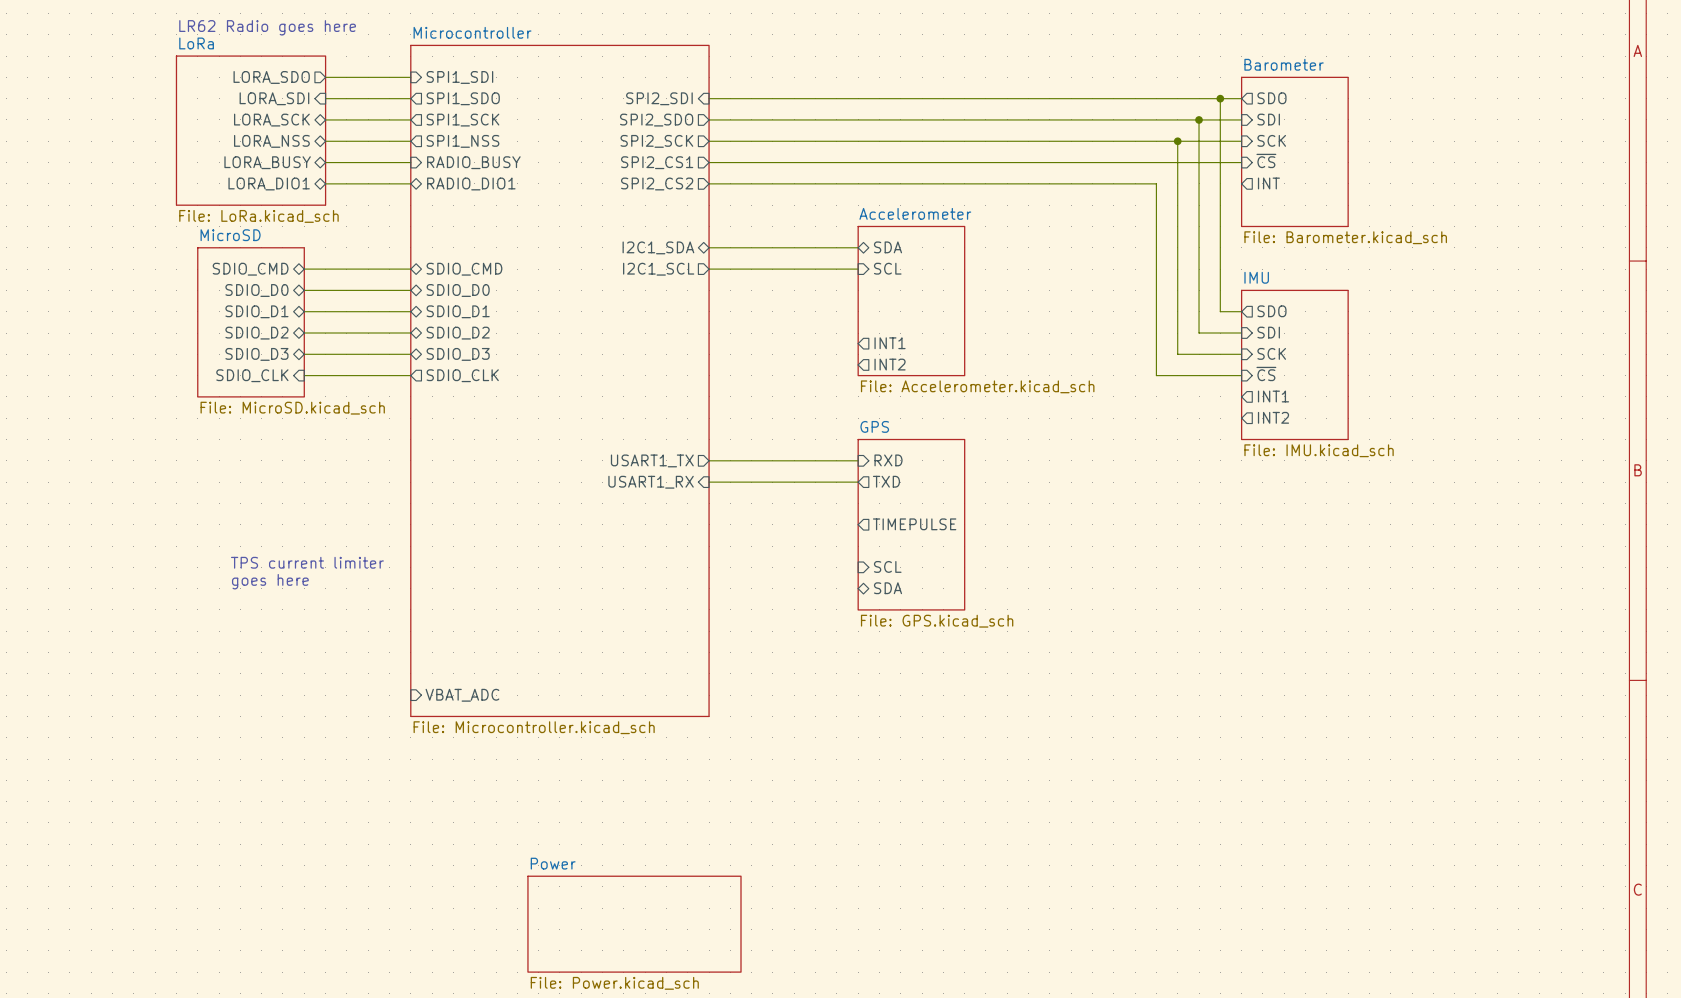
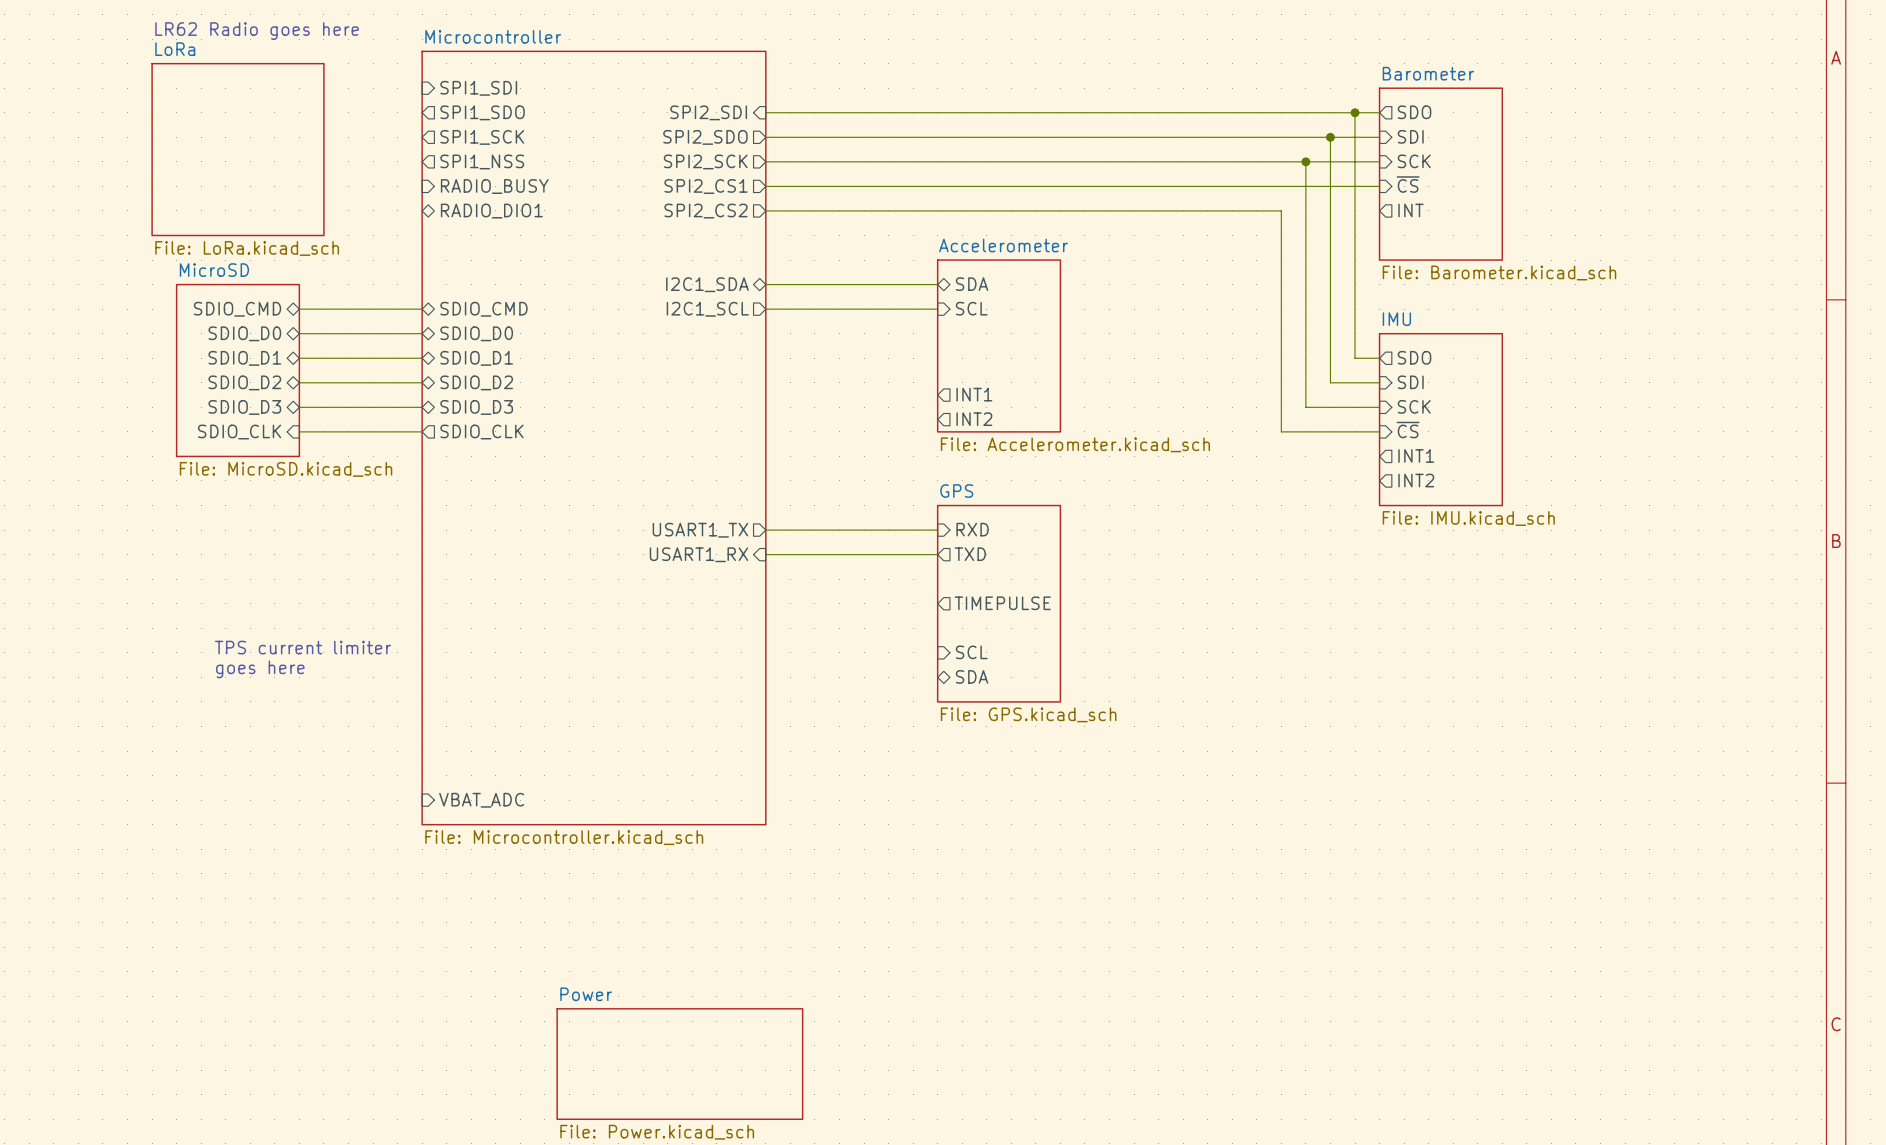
sheet pin: LORA_SDO (271, 77) -> none
wire: (325, 77) (410, 77) -> none
sheet pin: LORA_SDI (274, 98) -> none
wire: (325, 98) (410, 98) -> none
wire: (325, 119) (410, 119) -> none
sheet pin: LORA_SCK (271, 120) -> none
sheet pin: LORA_NSS (271, 141) -> none
wire: (325, 141) (410, 141) -> none
sheet pin: LORA_BUSY (267, 162) -> none
wire: (325, 162) (410, 162) -> none
sheet pin: LORA_DIO1 (269, 183) -> none
wire: (325, 183) (410, 183) -> none

